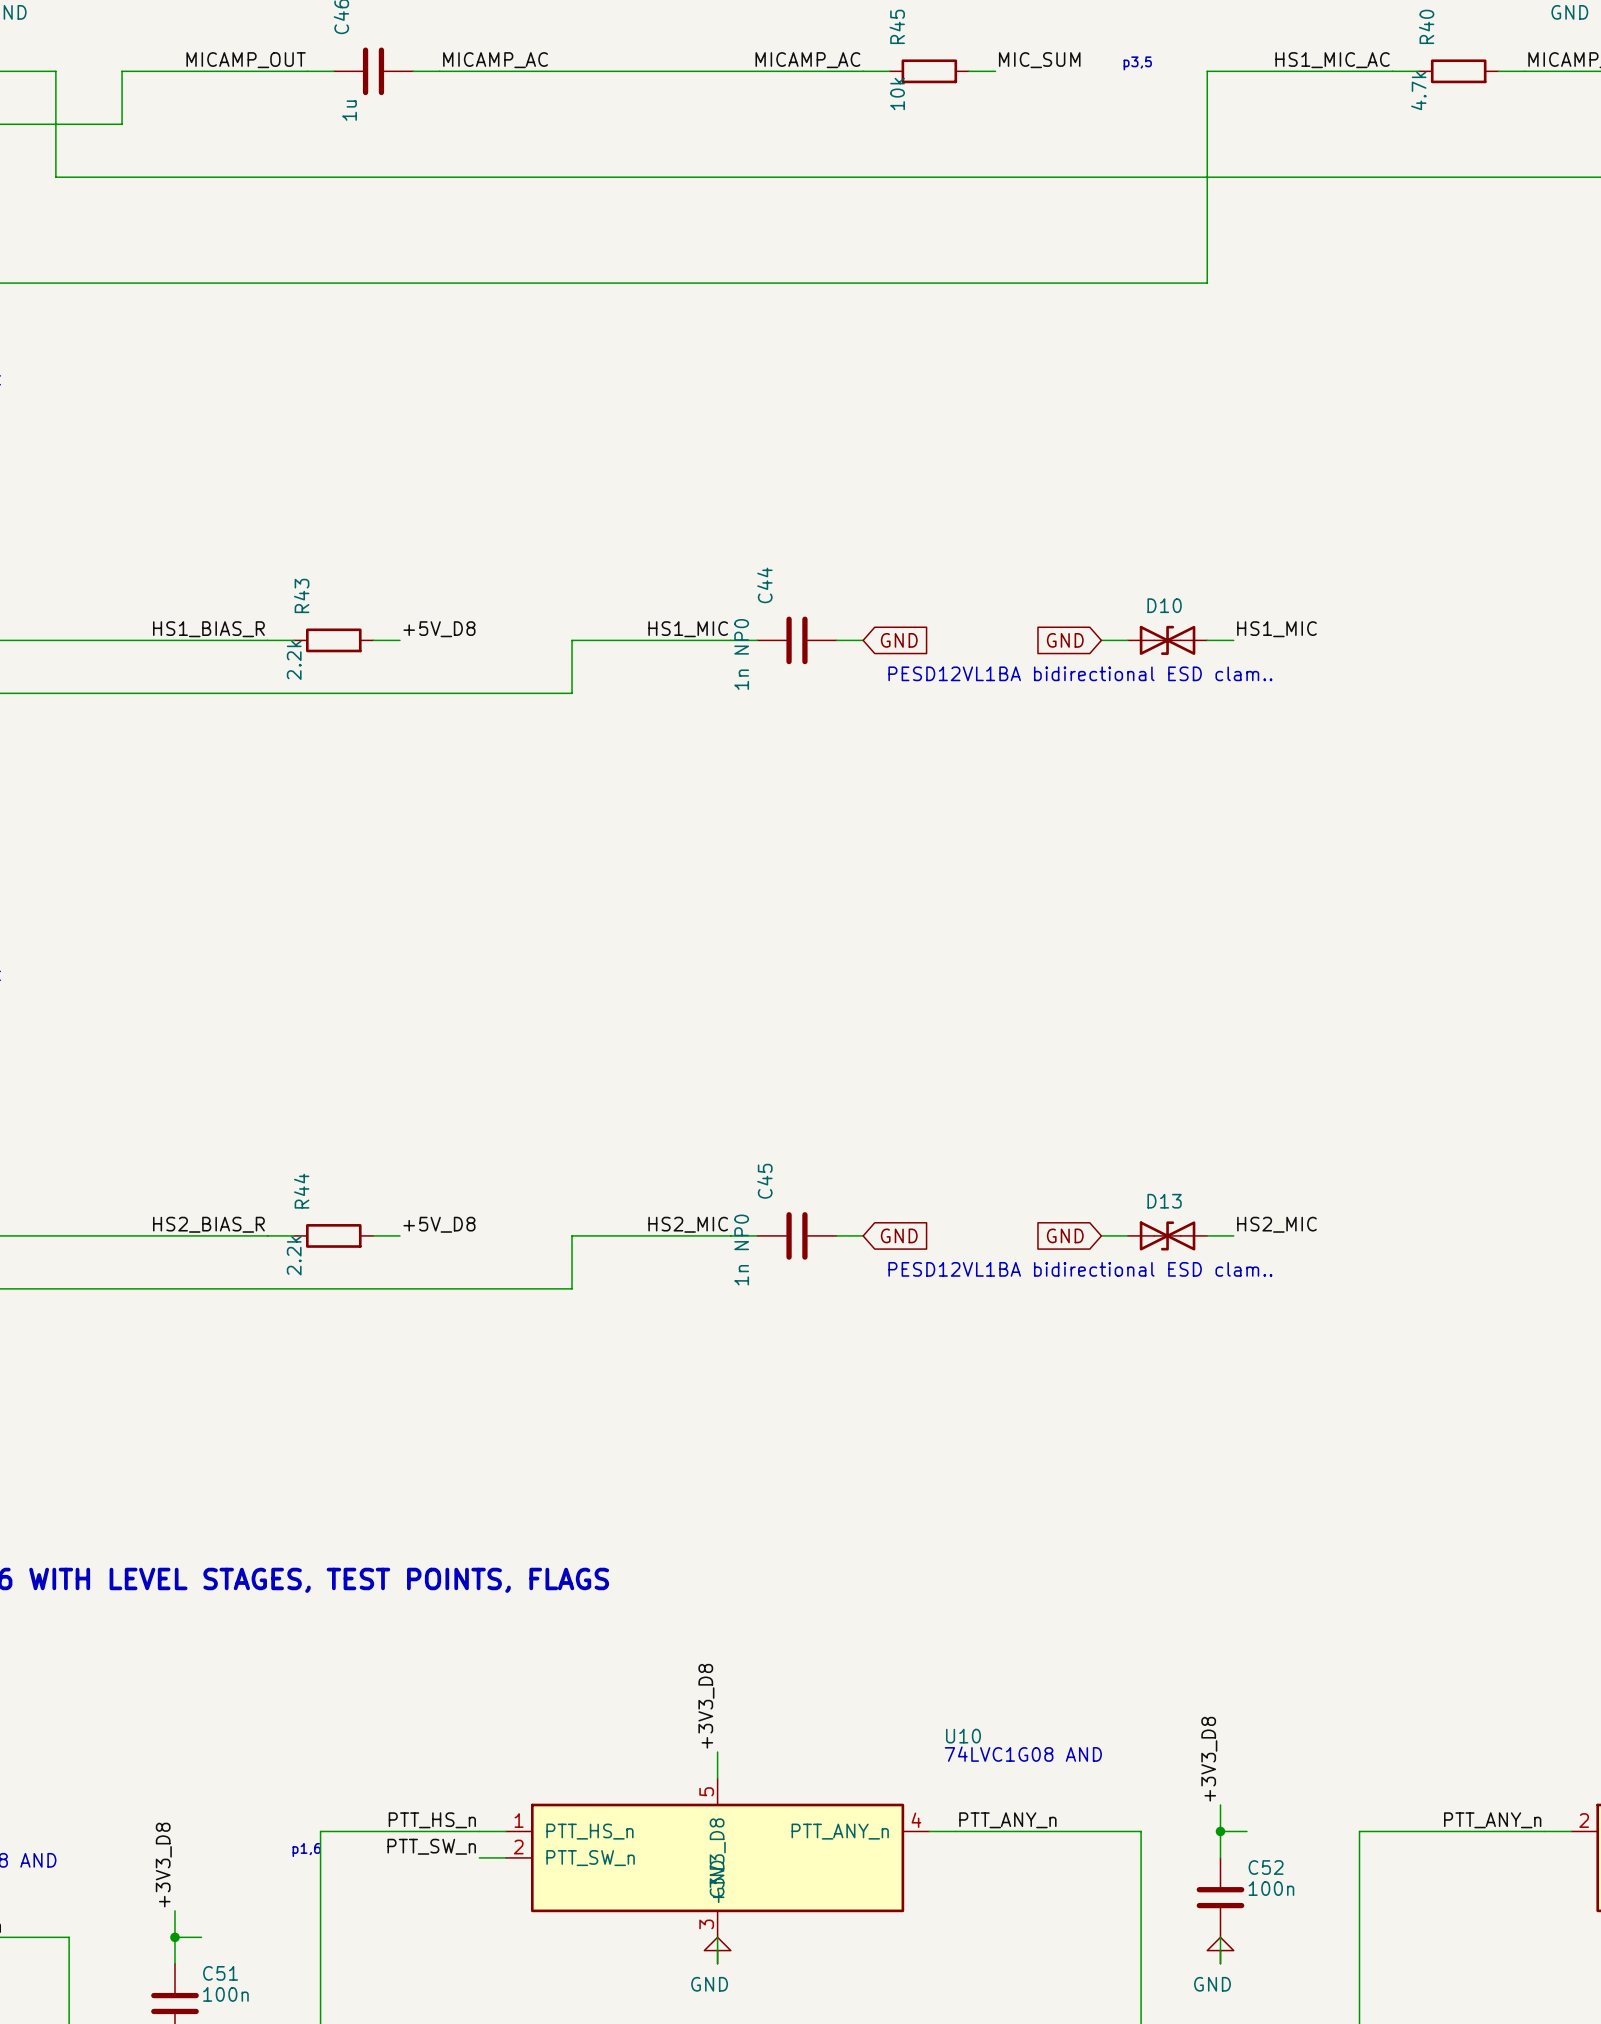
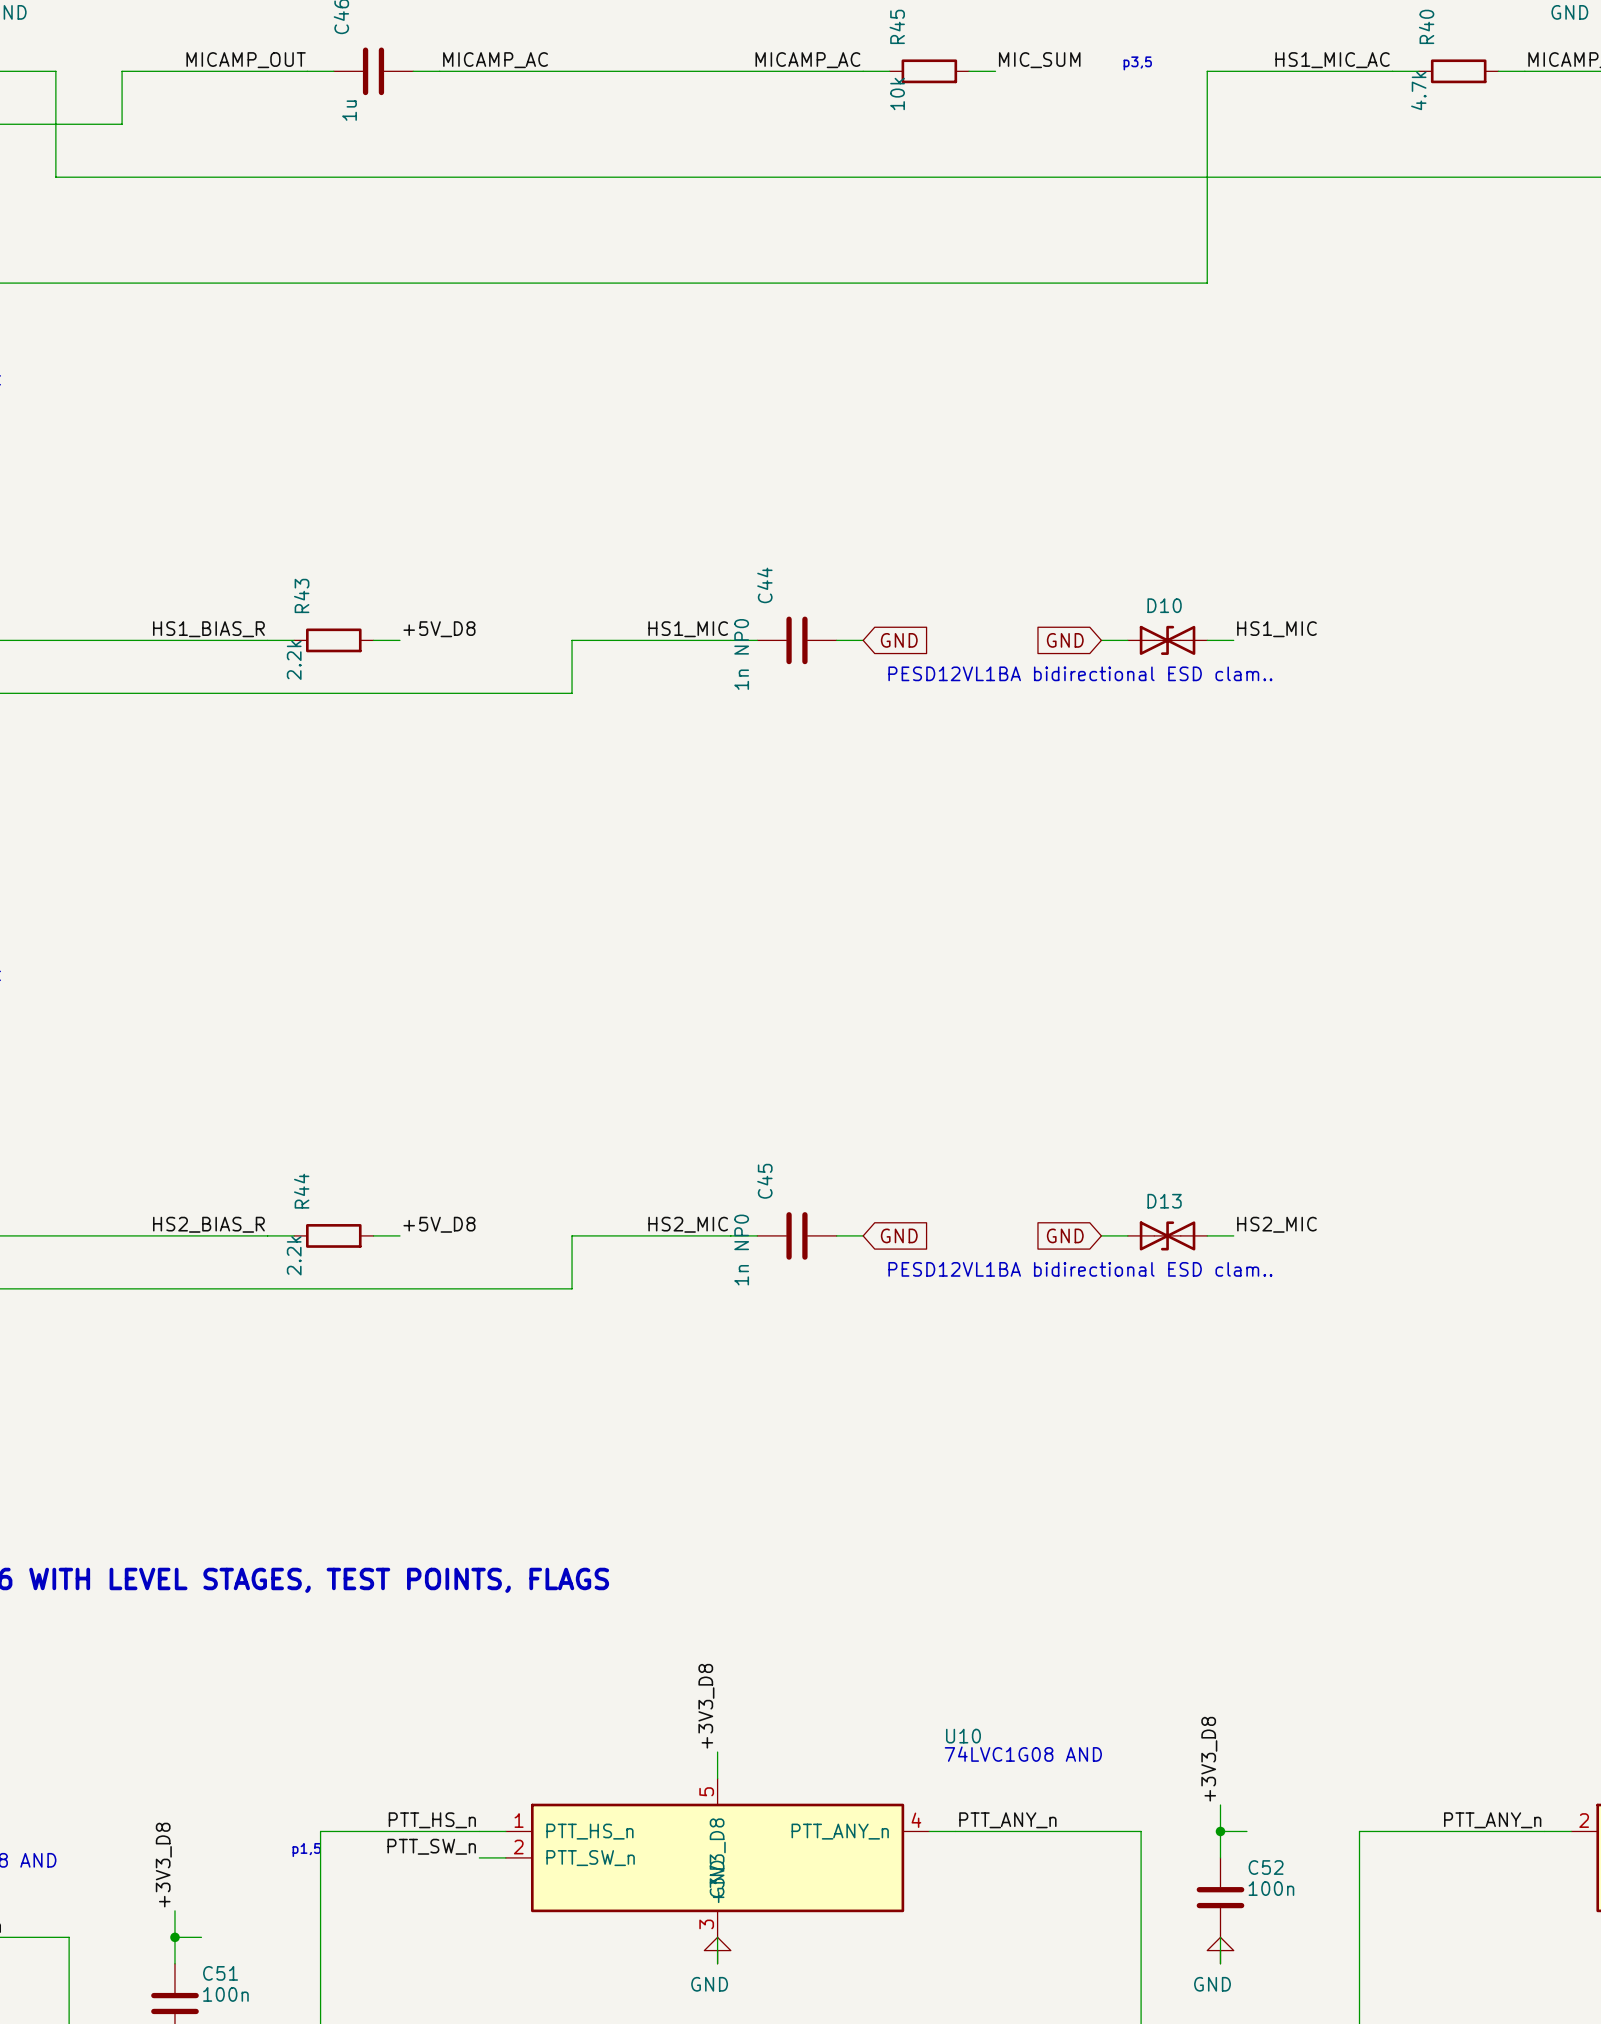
text: p1,6 (306, 1850) -> p1,5 (306, 1850)

